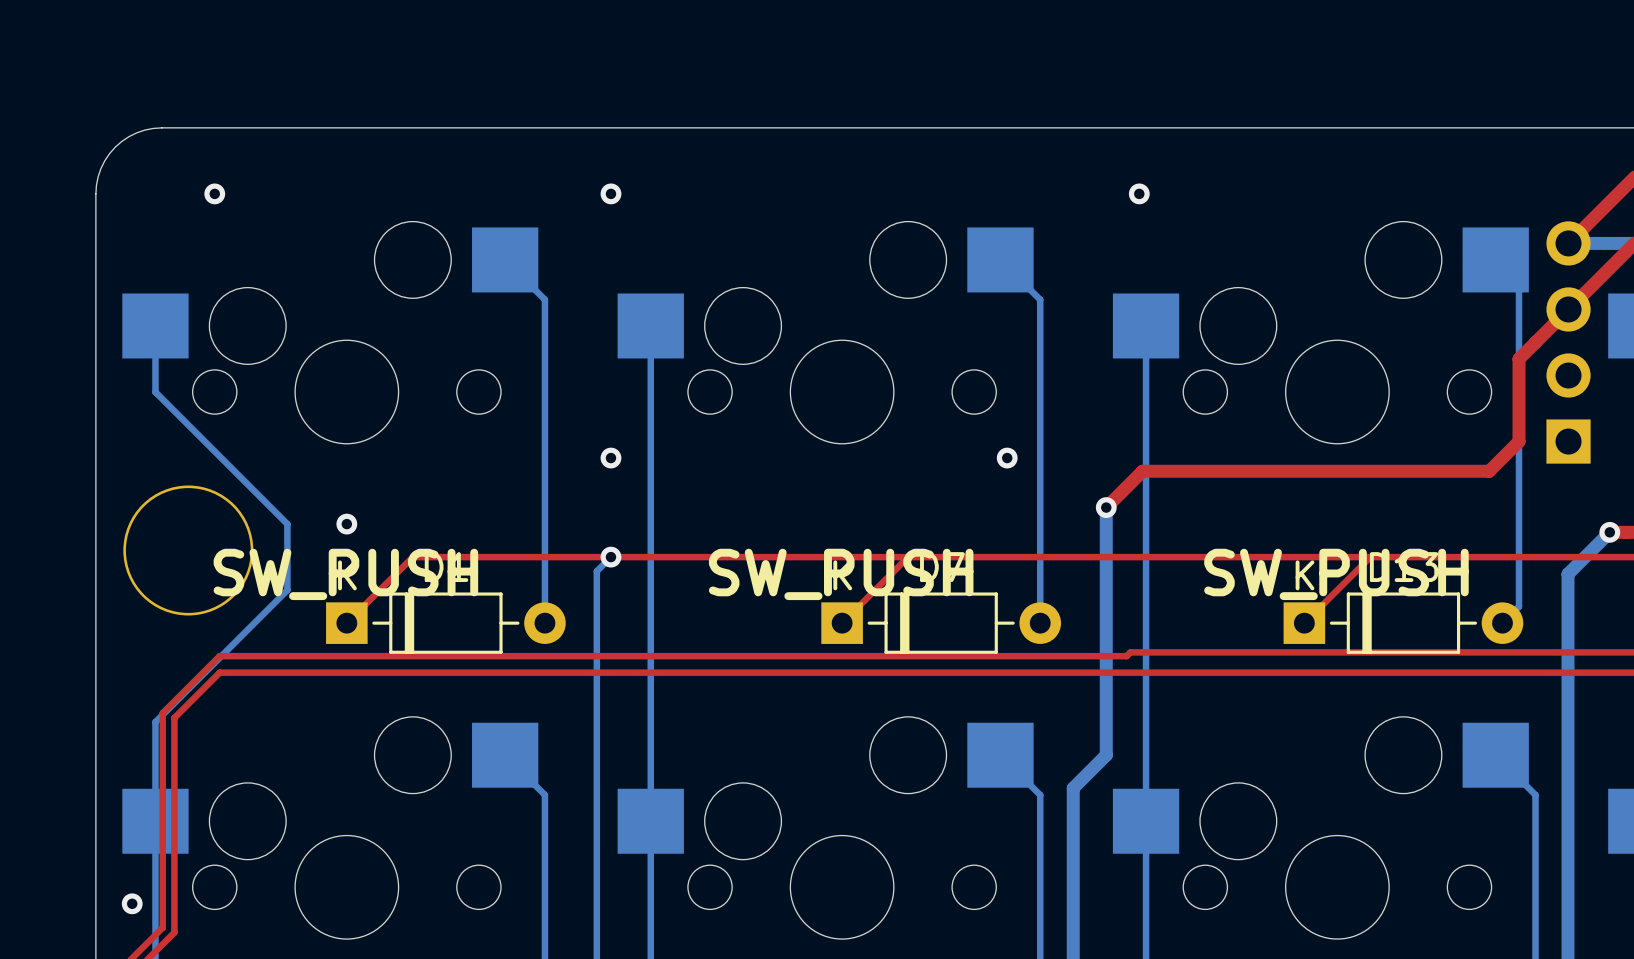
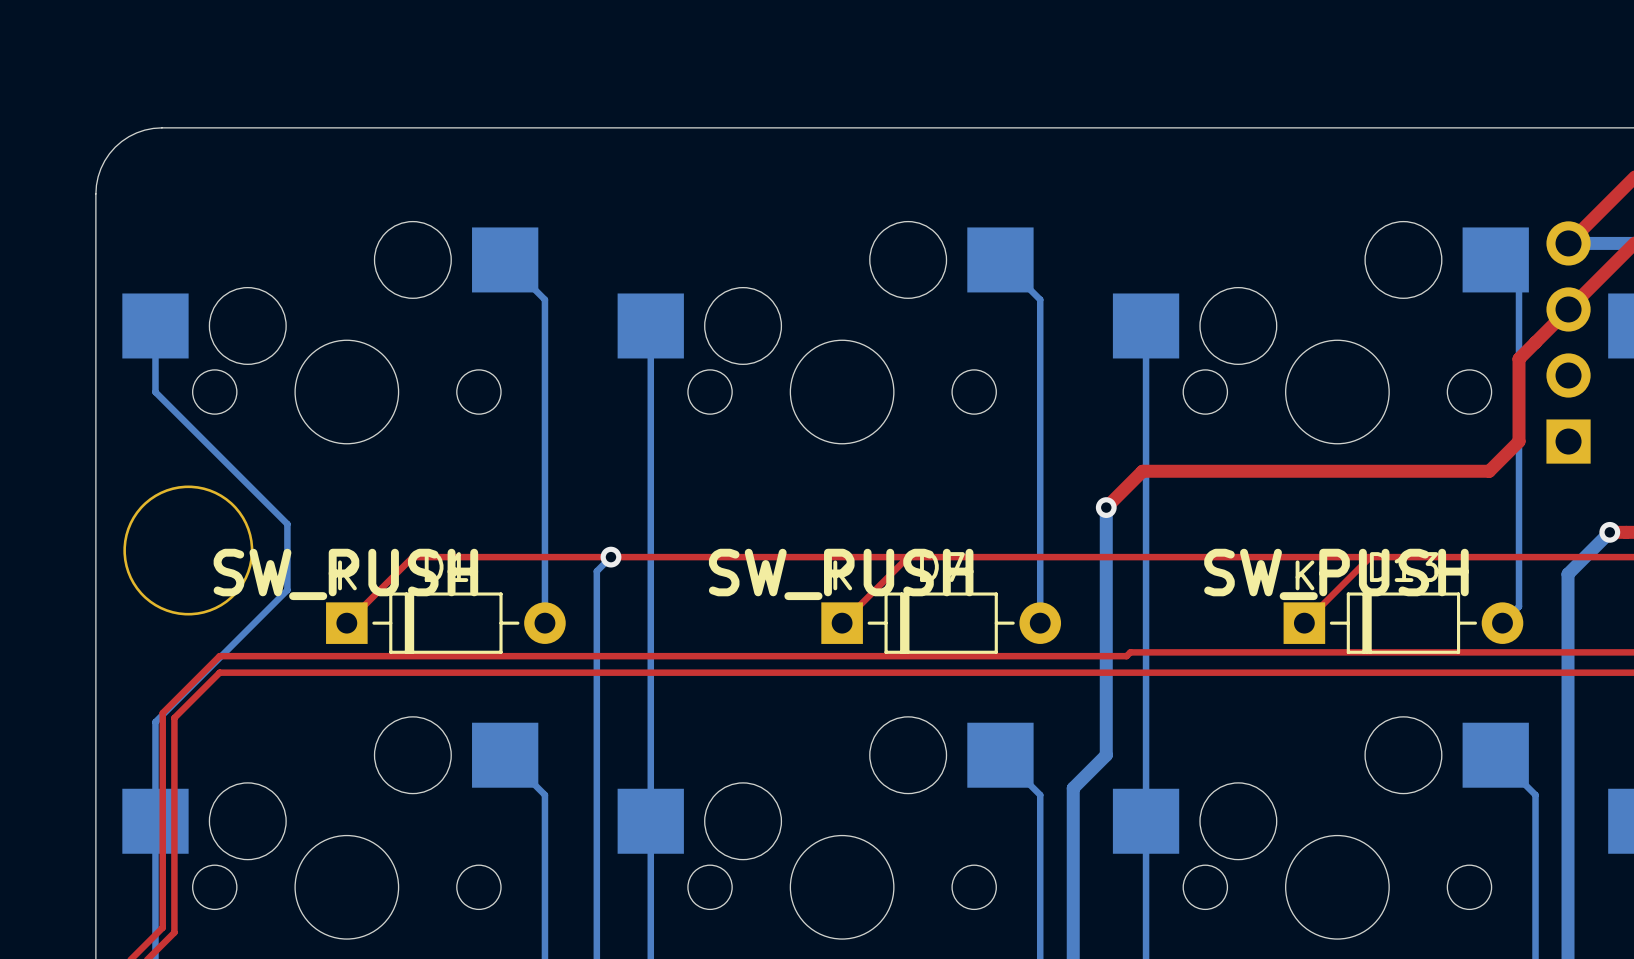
via: (214, 193) -> none
via: (610, 193) -> none
via: (1139, 193) -> none
via: (610, 458) -> none
via: (1007, 458) -> none
via: (346, 524) -> none
via: (132, 903) -> none

